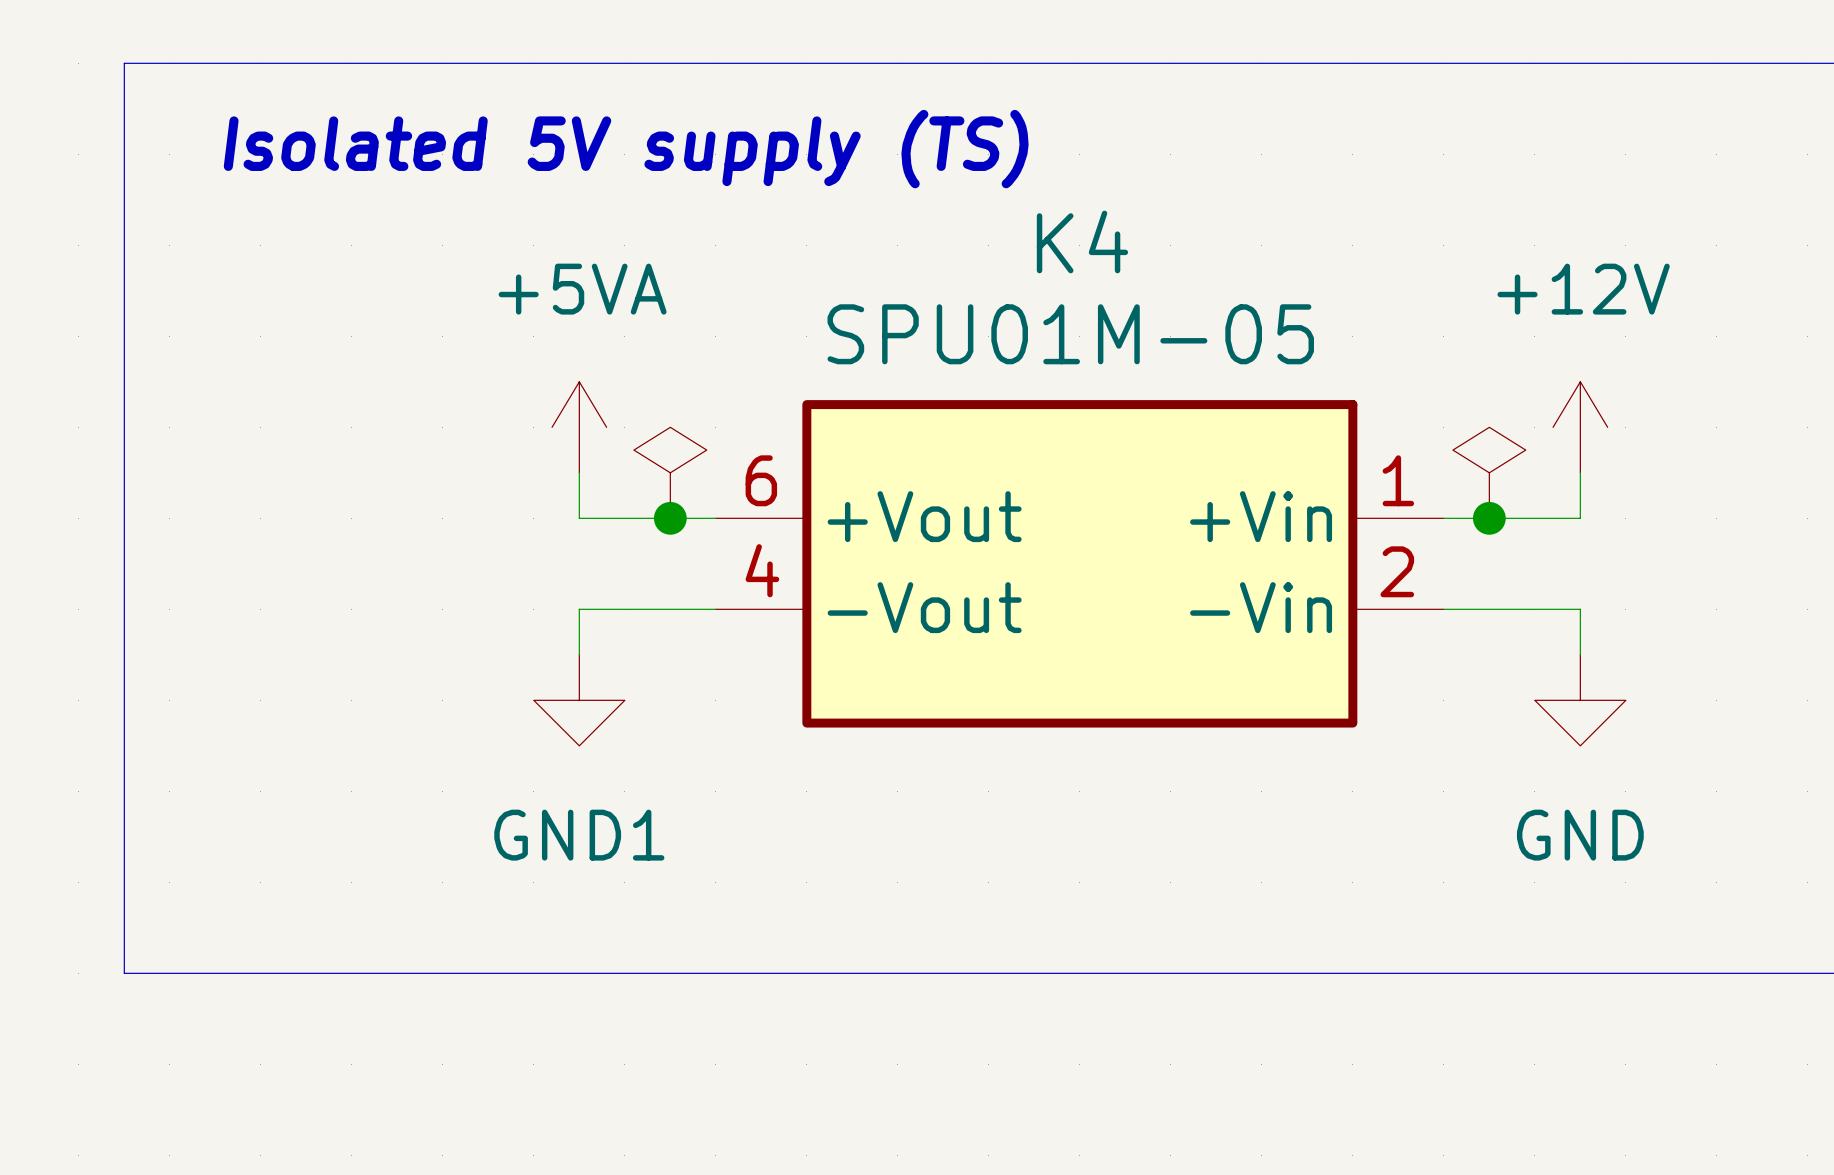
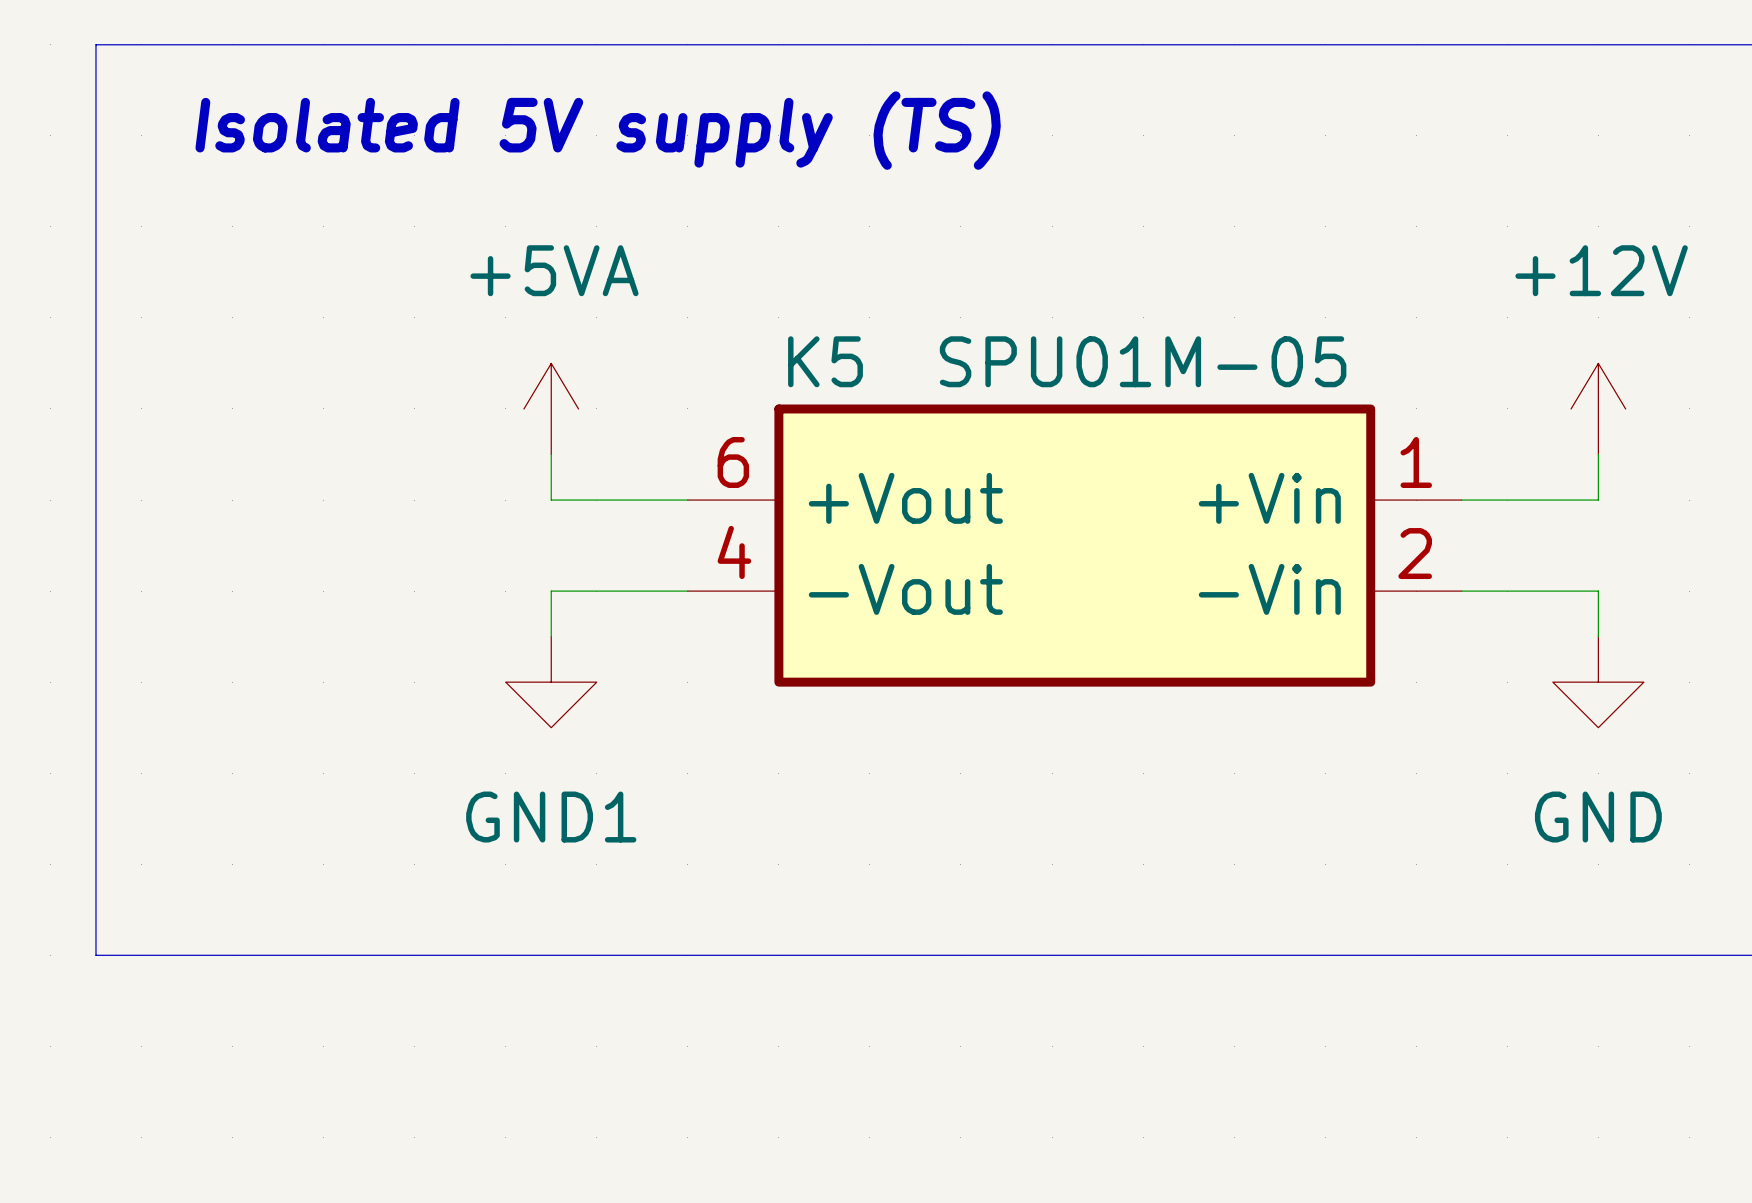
power symbol position: +12V (1580, 427) -> +12V (1598, 408)
power symbol: (670, 472) -> none
power symbol: (1489, 472) -> none
wire: (1580, 472) (1580, 518) -> (1598, 454) (1598, 500) (1552, 500)
junction: (670, 518) -> none
junction: (1489, 518) -> none
K4: SPU01M-05 (1079, 563) -> none
K5: none -> SPU01M-05 (1074, 545)
wire: (1580, 609) (1580, 654) -> (1552, 591) (1598, 591) (1598, 636)
power symbol position: GND (1580, 700) -> GND (1598, 682)

